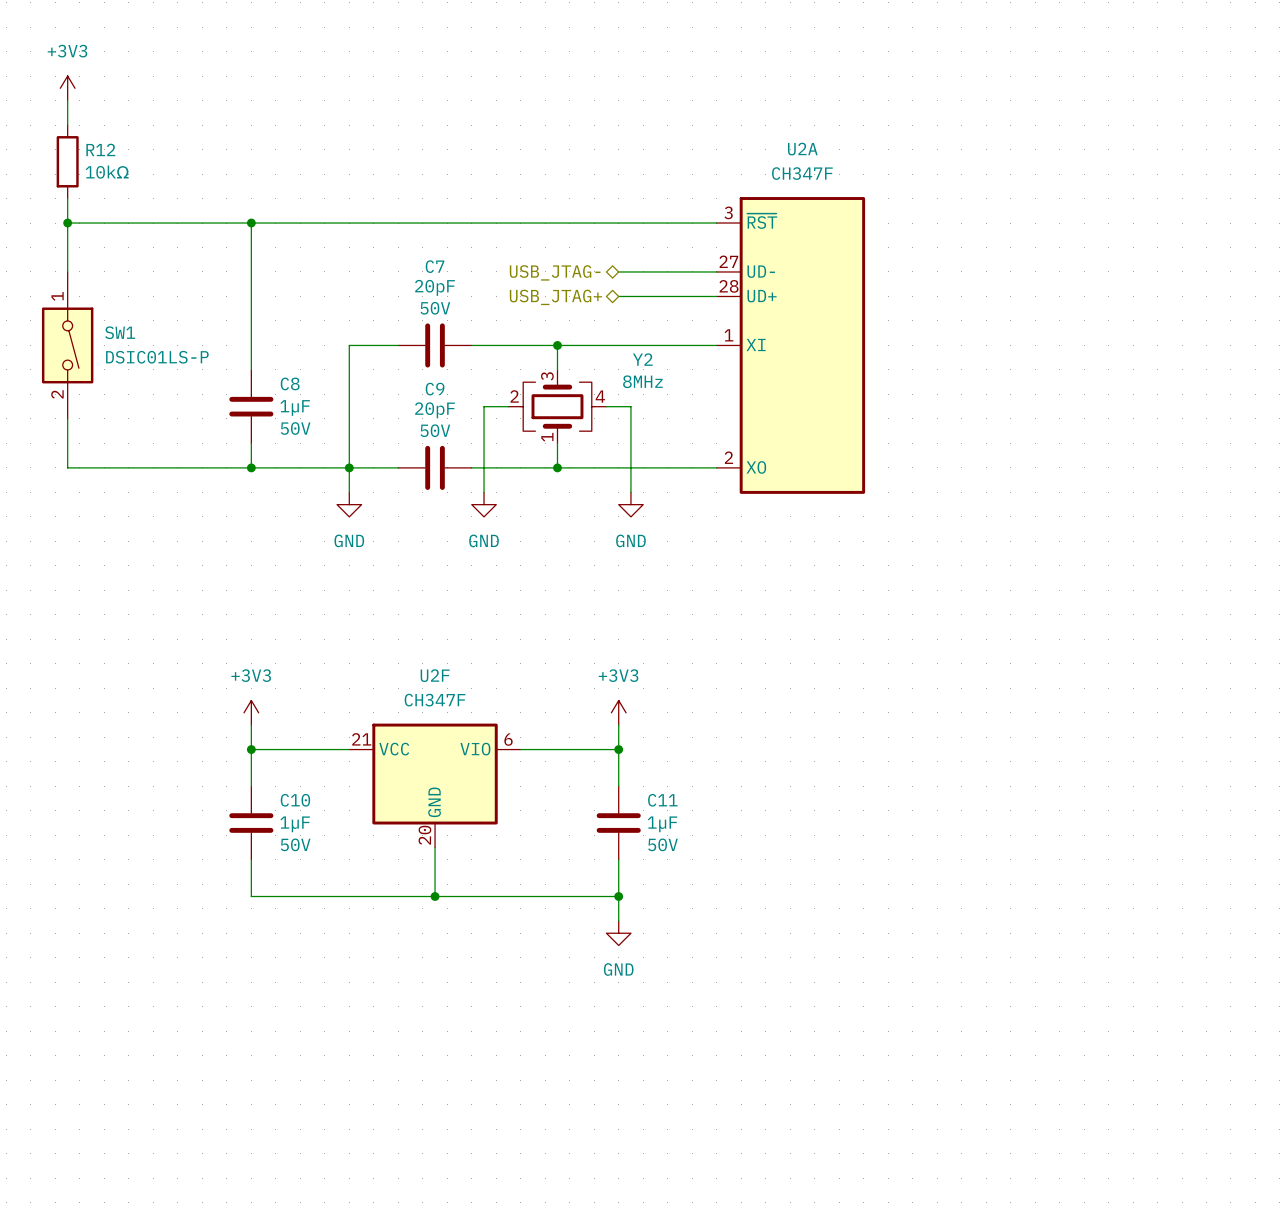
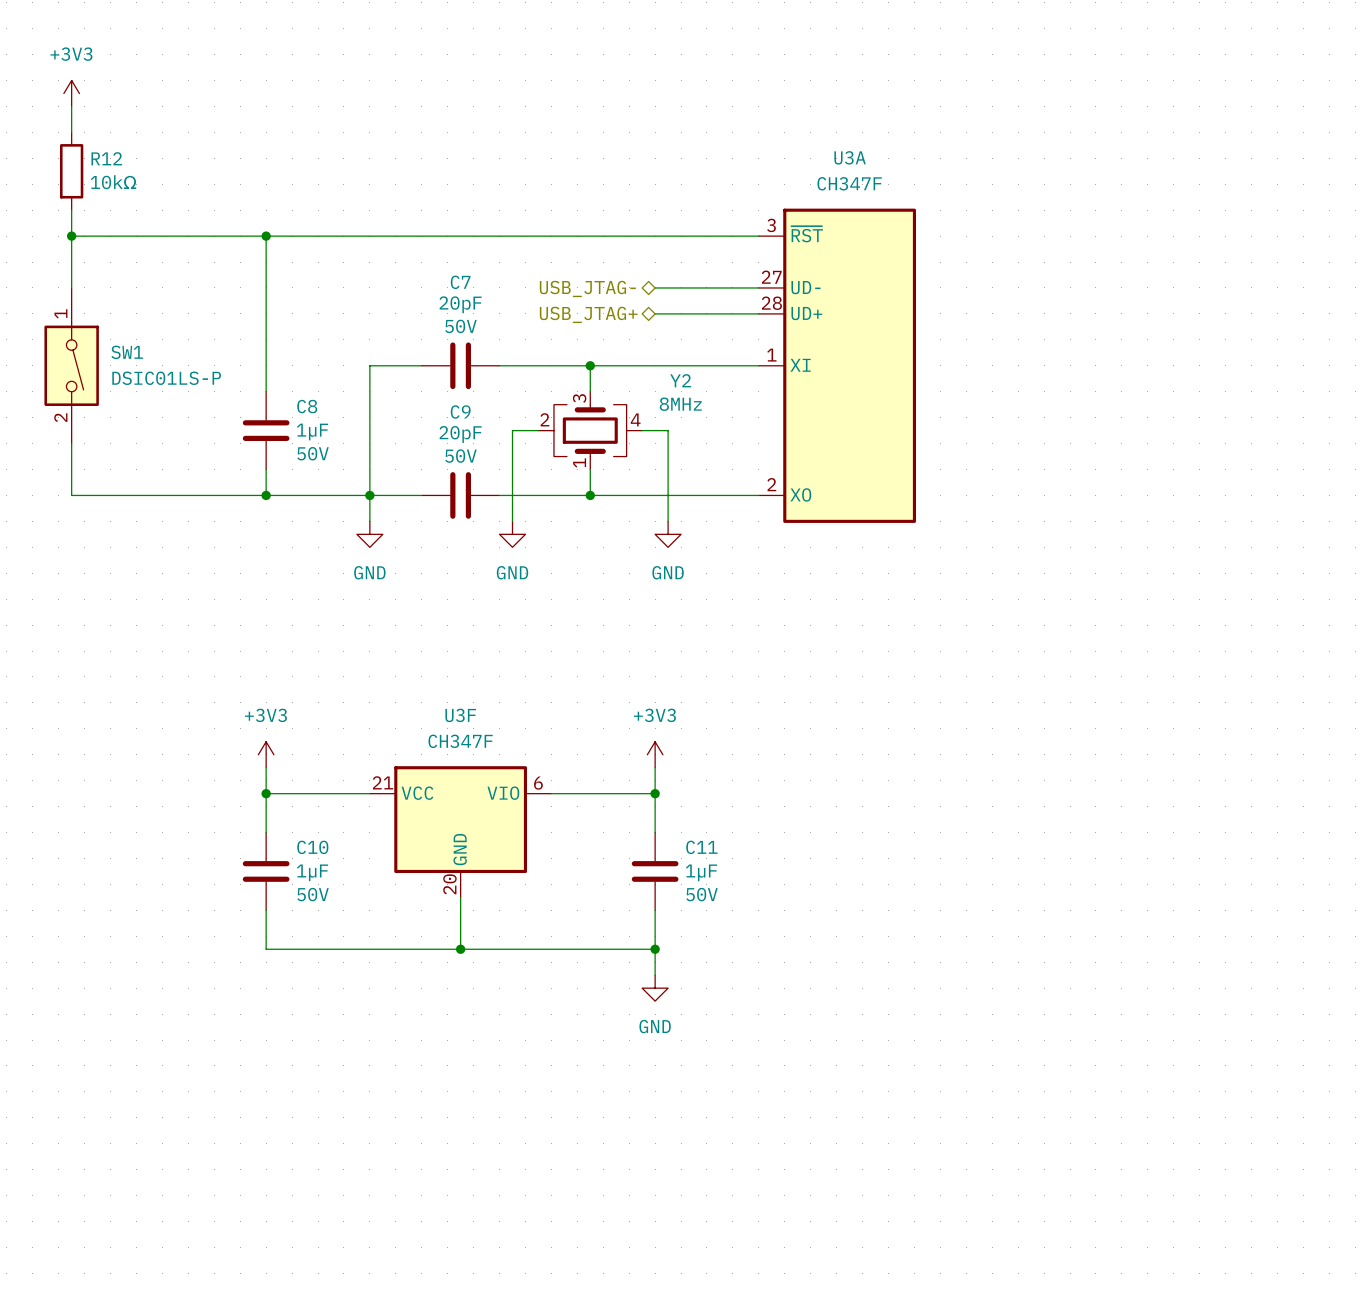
U2A name: U2A (802, 149) -> U3A (850, 157)
U2F name: U2F (435, 675) -> U3F (460, 715)

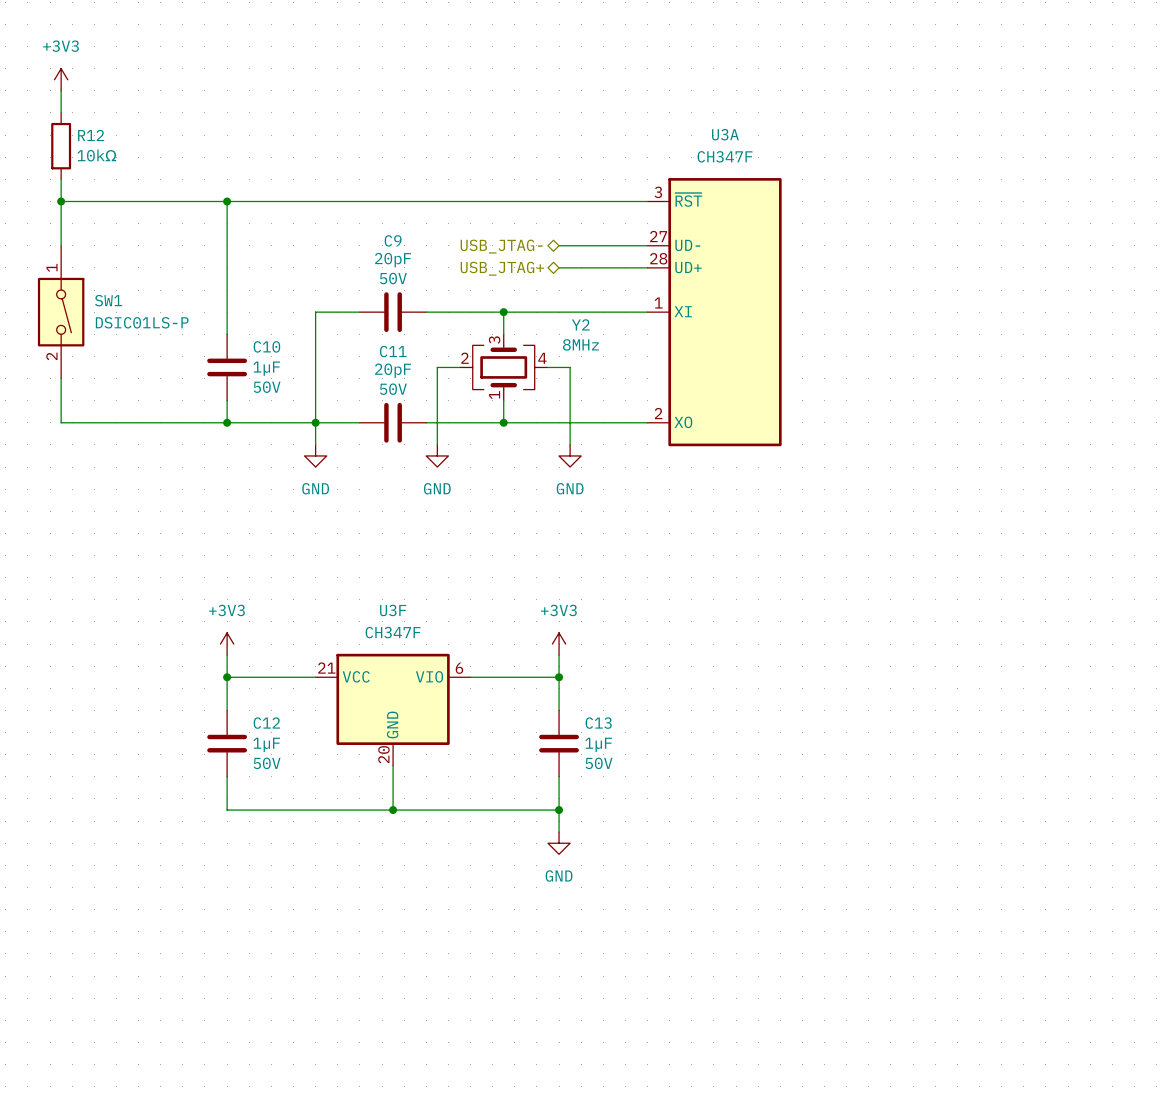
C7 name: C7 (460, 282) -> C9 (393, 240)
C8 name: C8 (307, 406) -> C10 (266, 346)
C9 name: C9 (460, 411) -> C11 (393, 351)
C10 name: C10 (312, 847) -> C12 (266, 723)
C11 name: C11 (701, 847) -> C13 (598, 723)

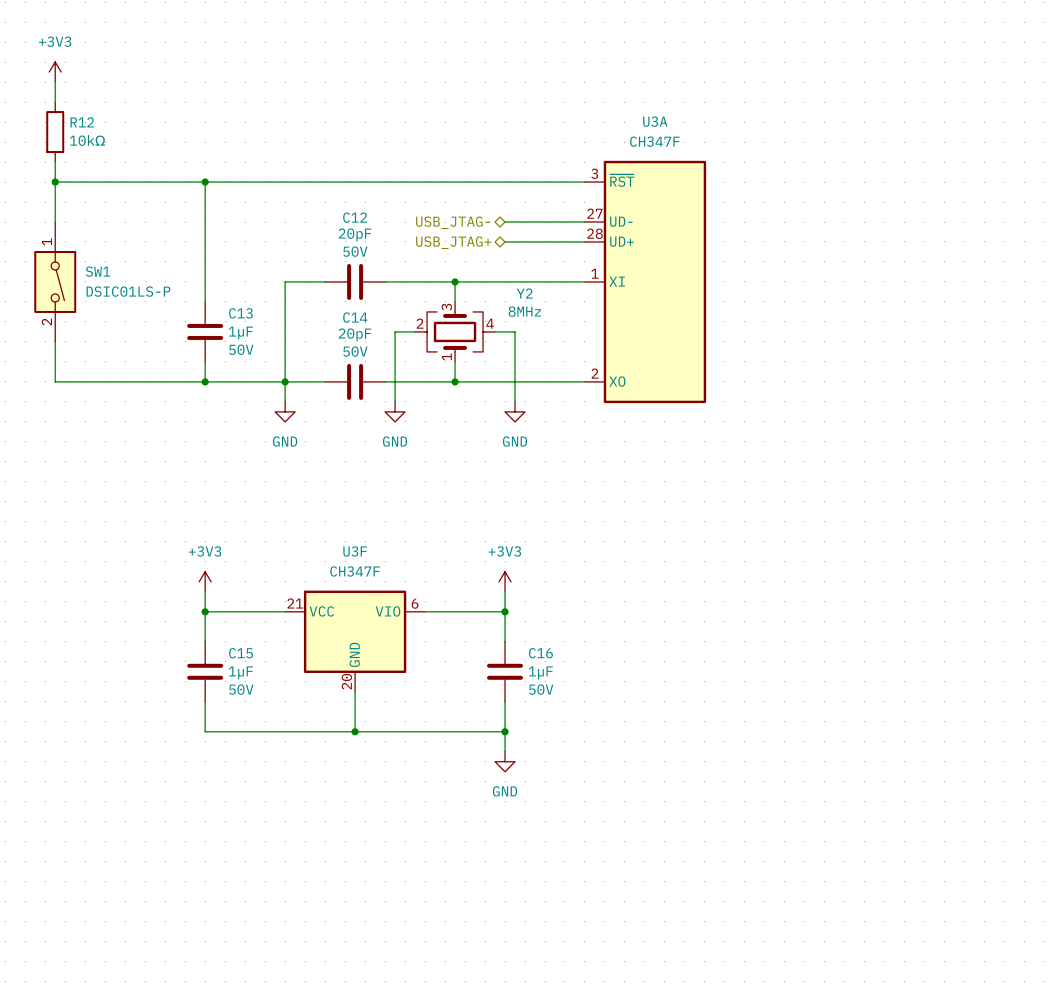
C9 name: C9 (393, 240) -> C12 (355, 217)
C10 name: C10 (266, 346) -> C13 (240, 313)
C11 name: C11 (393, 351) -> C14 (355, 317)
C12 name: C12 (266, 723) -> C15 (241, 653)
C13 name: C13 (598, 723) -> C16 (540, 653)

